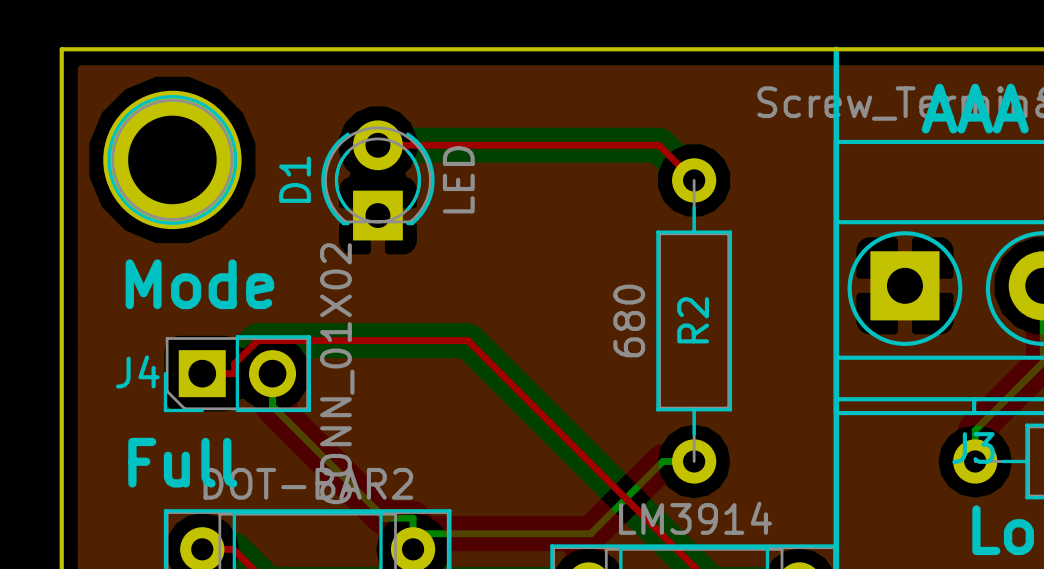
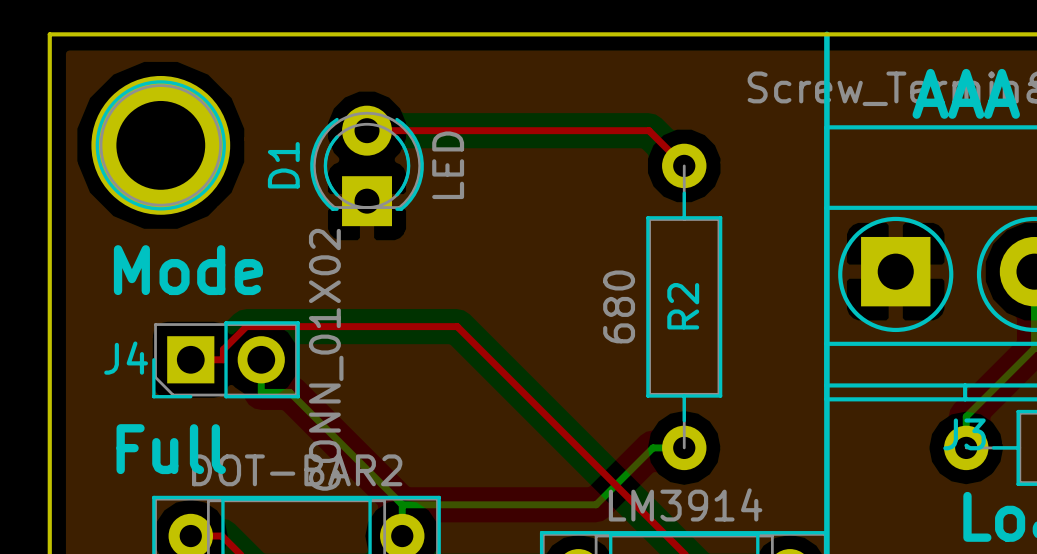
bottom track: (272, 406) (384, 518) (413, 518) -> none
bottom track: (606, 518) (590, 533) (413, 533) -> (596, 504) (402, 504) (289, 392) (261, 392)

